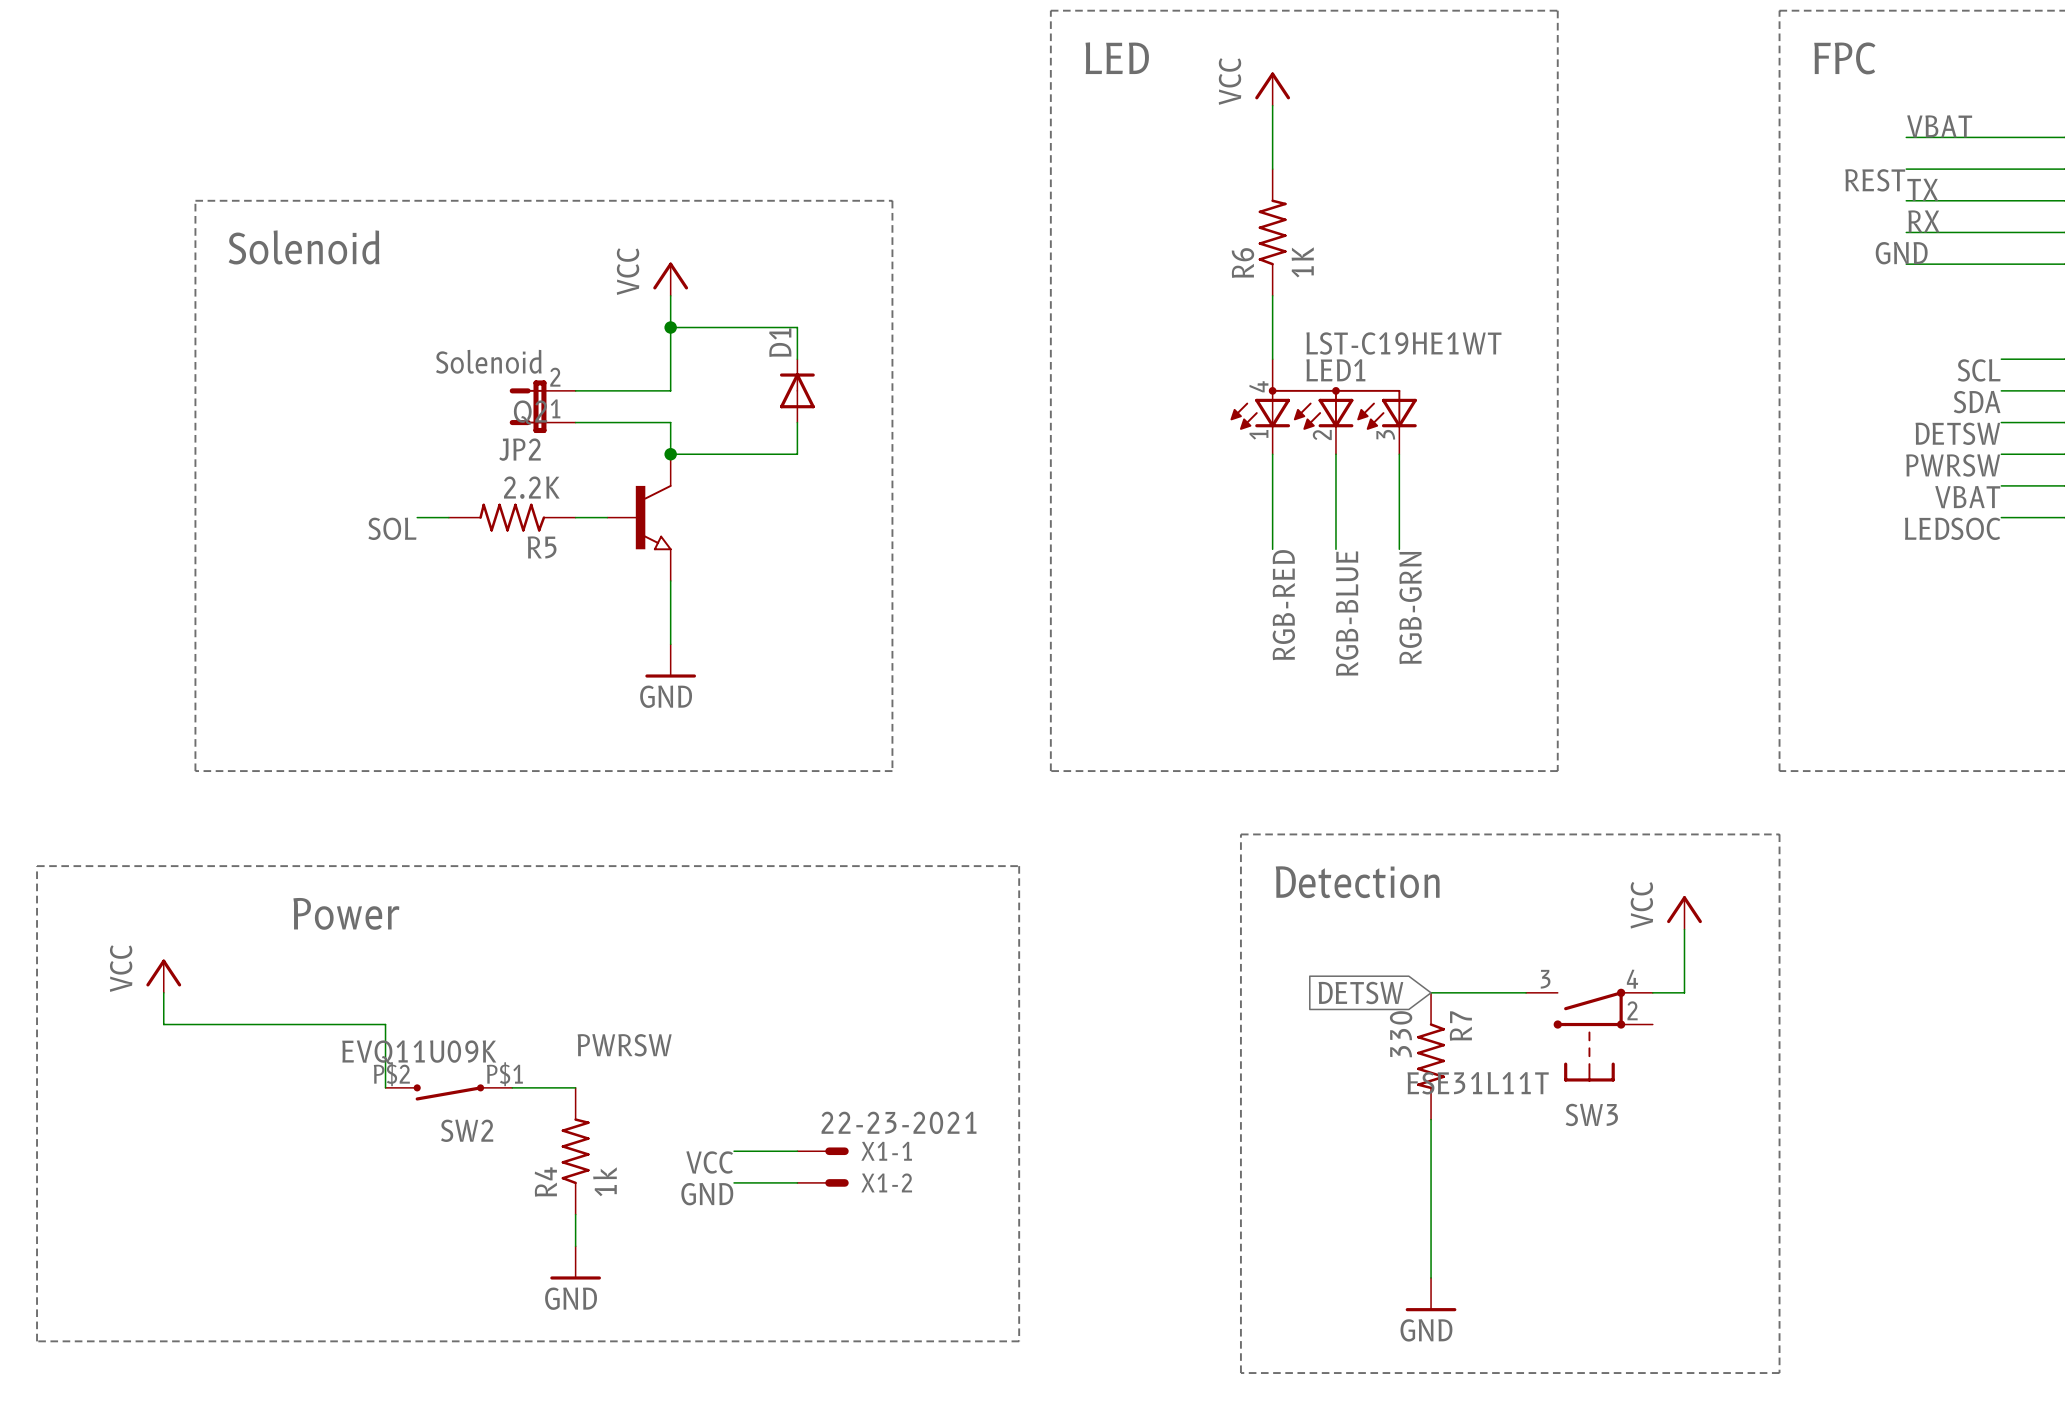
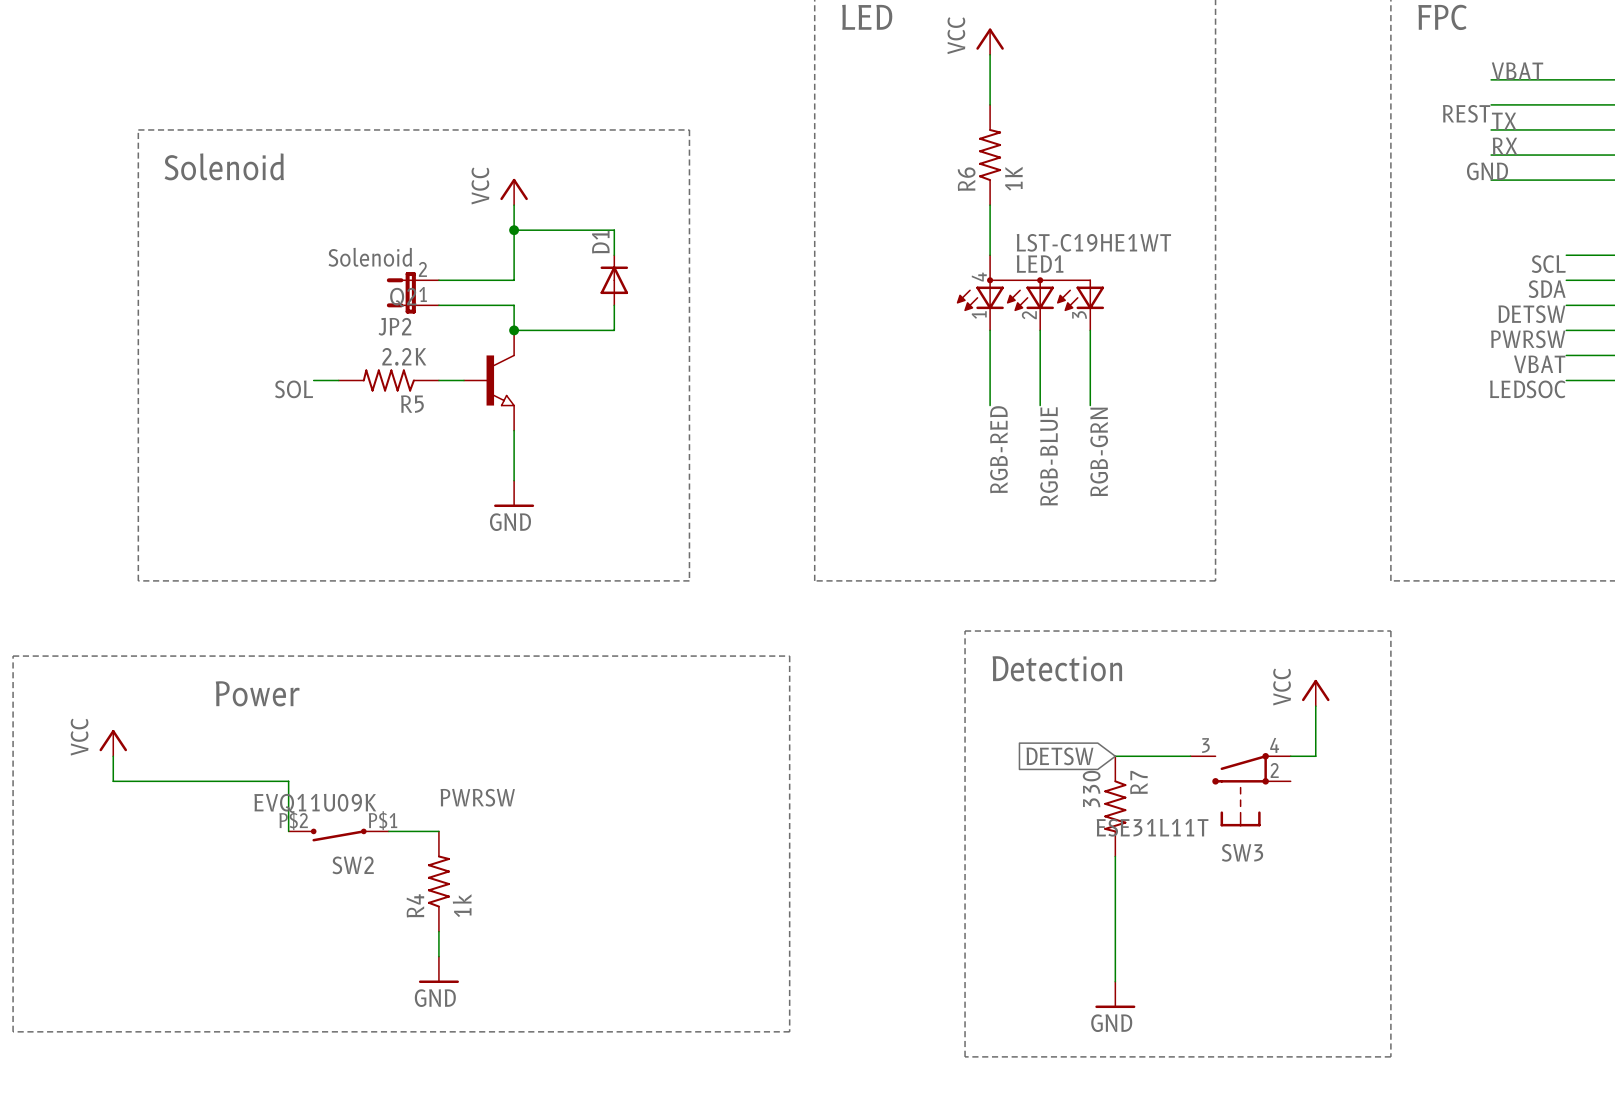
wire: (734, 1151) (797, 1151) -> none
X1-1: 22-23-2021 (823, 1151) -> none
label: VCC (709, 1162) -> none
wire: (734, 1182) (797, 1182) -> none
X1-2: (823, 1182) -> none
label: GND (707, 1194) -> none

